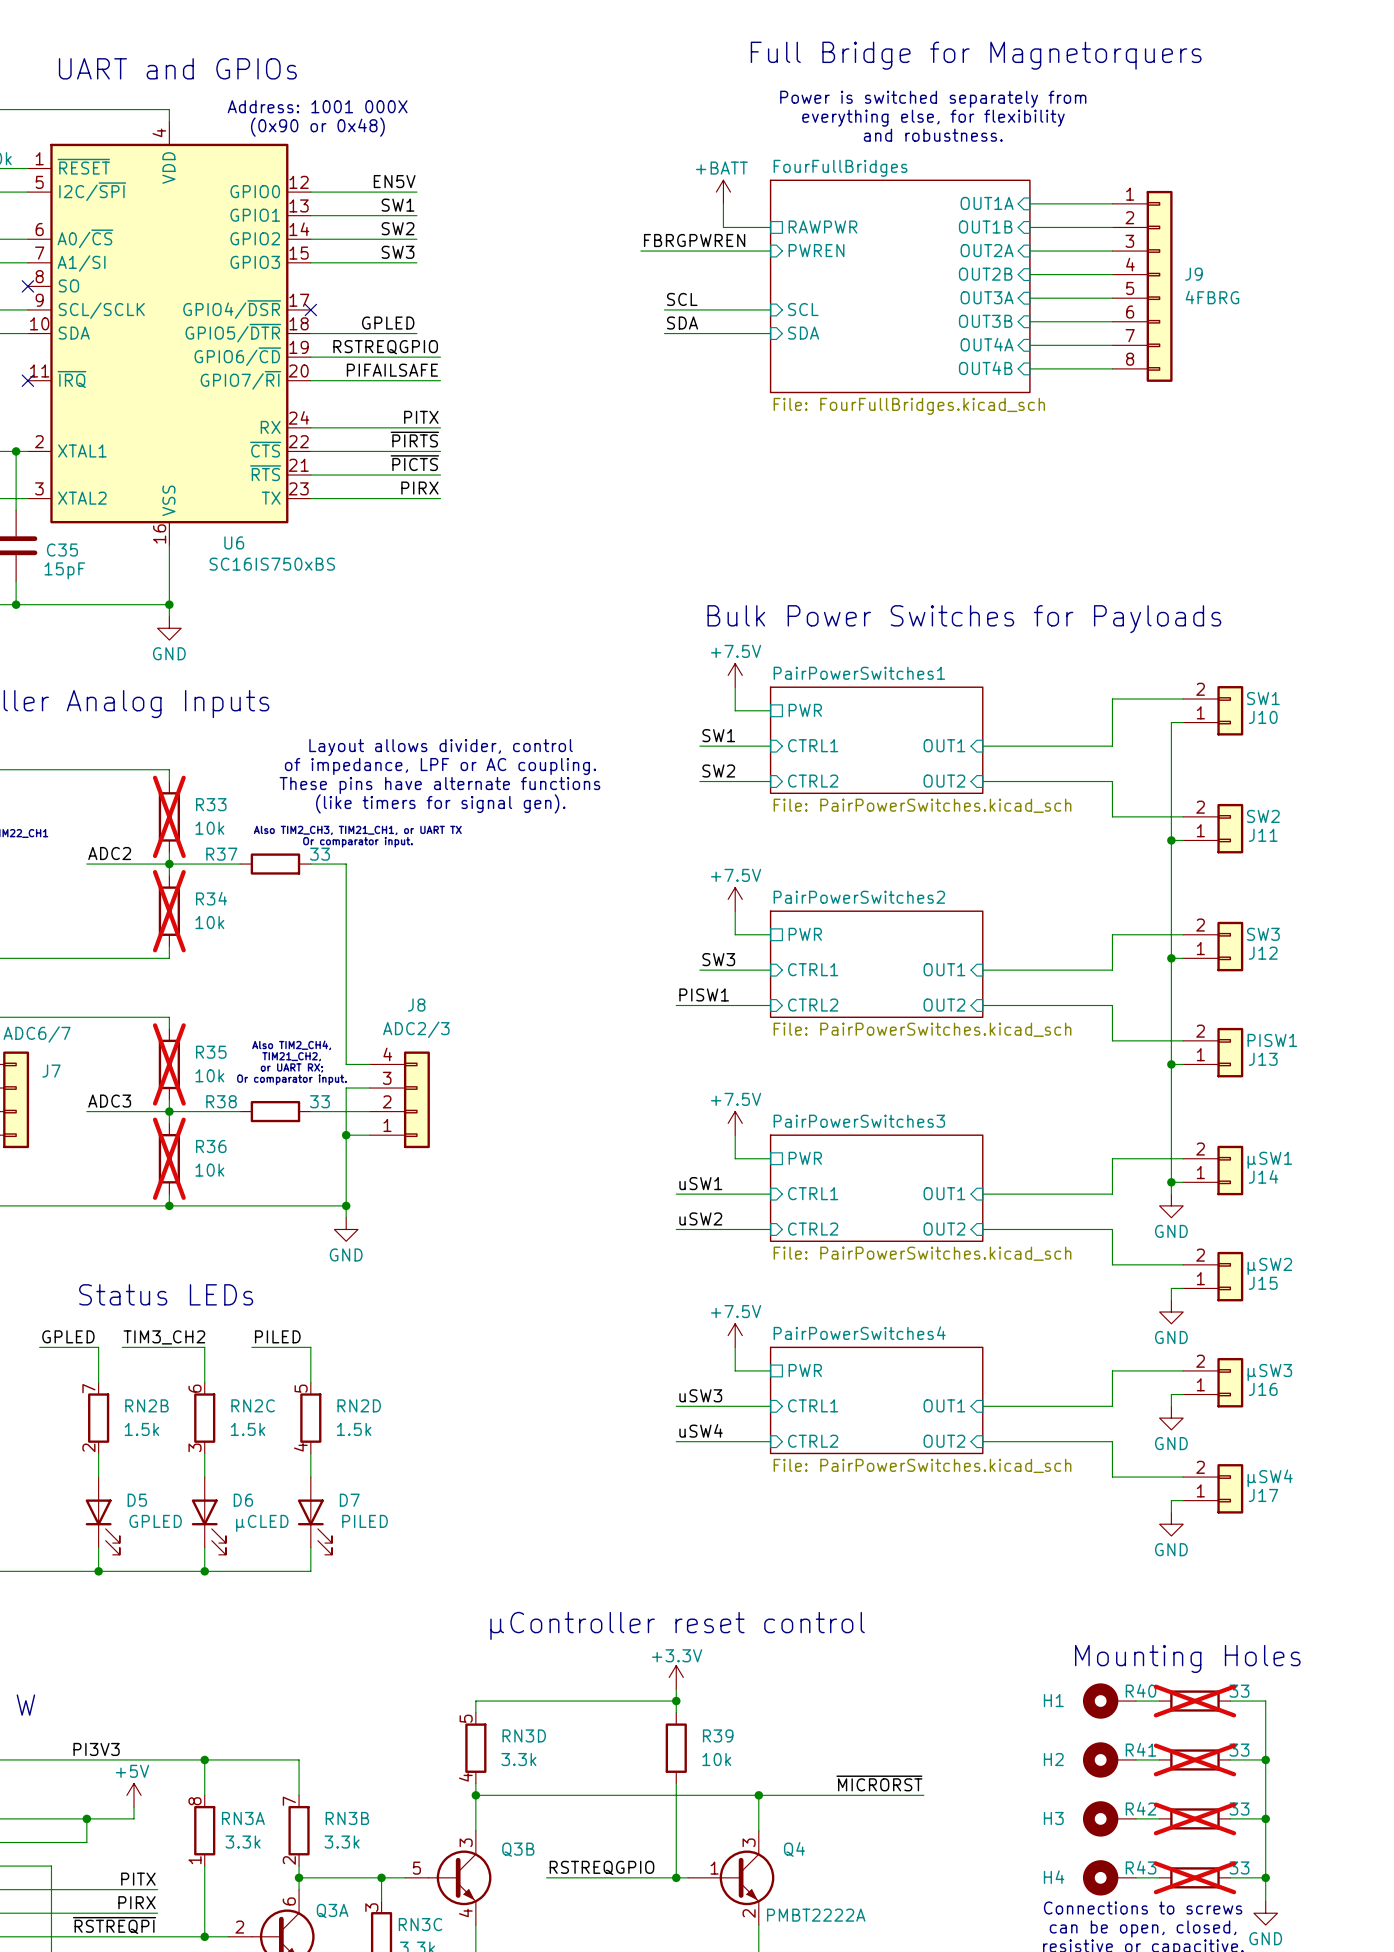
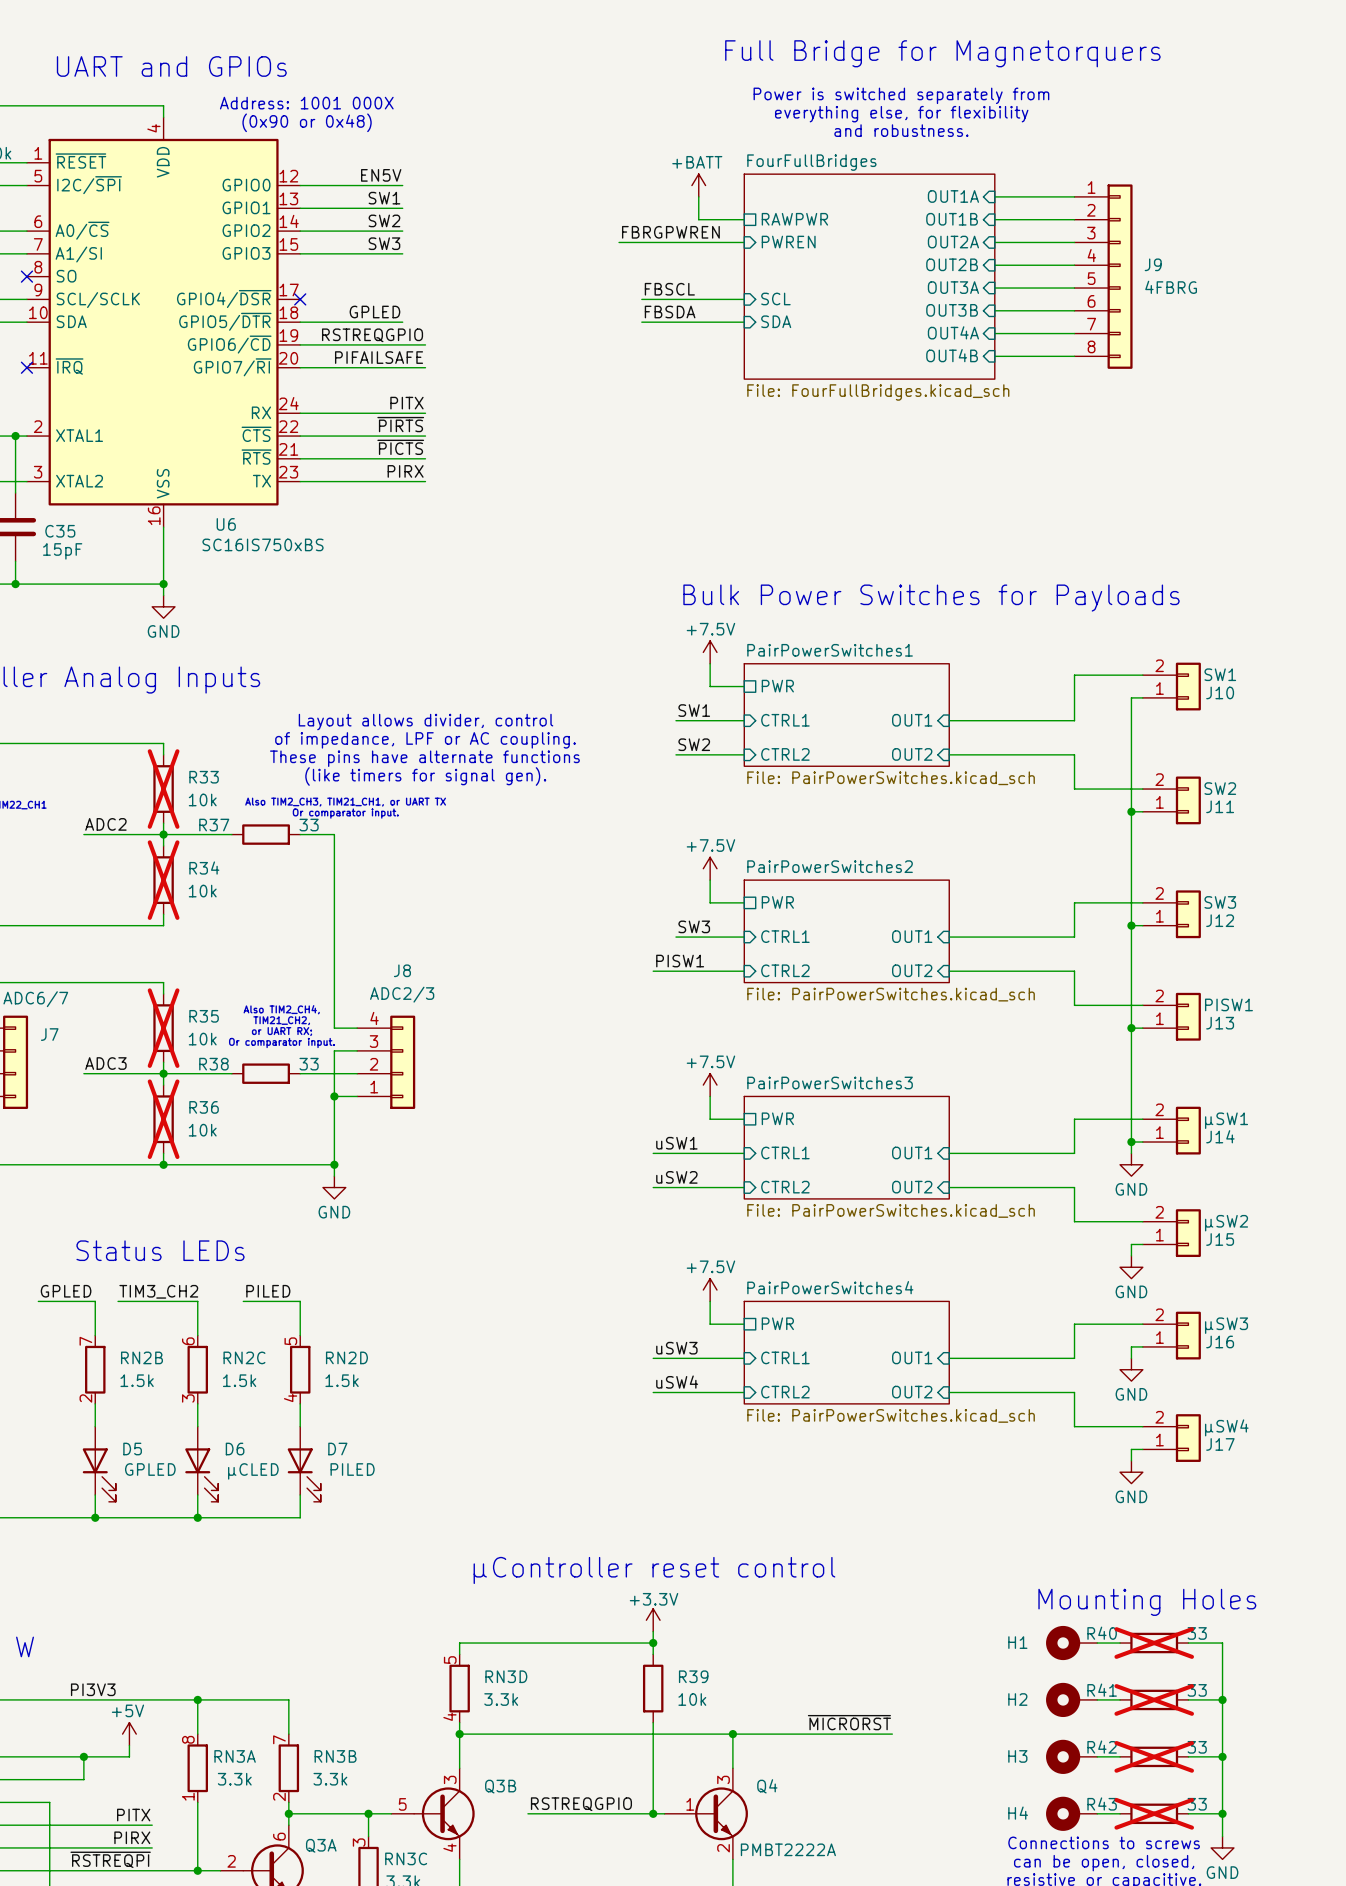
label: SCL (682, 299) -> FBSCL (669, 289)
label: SDA (682, 323) -> FBSDA (670, 312)

